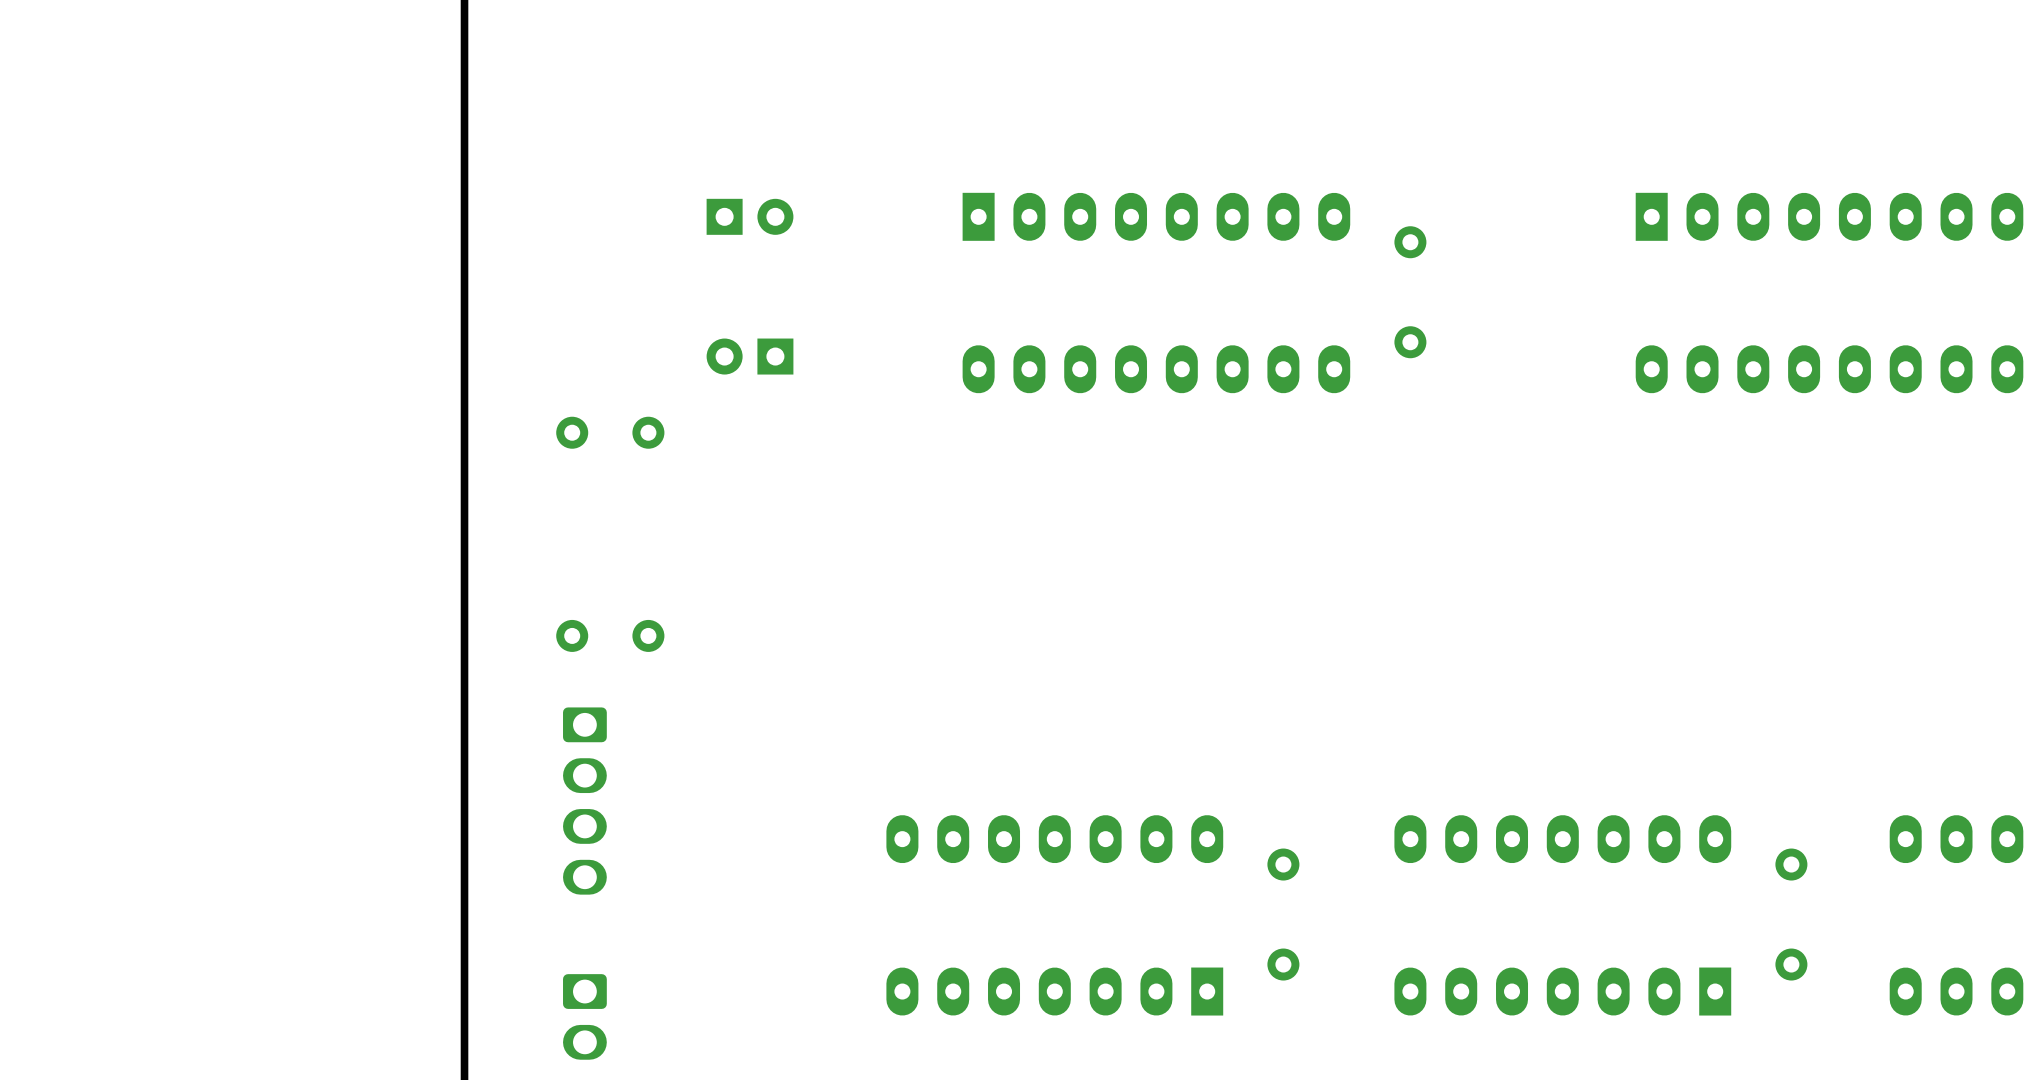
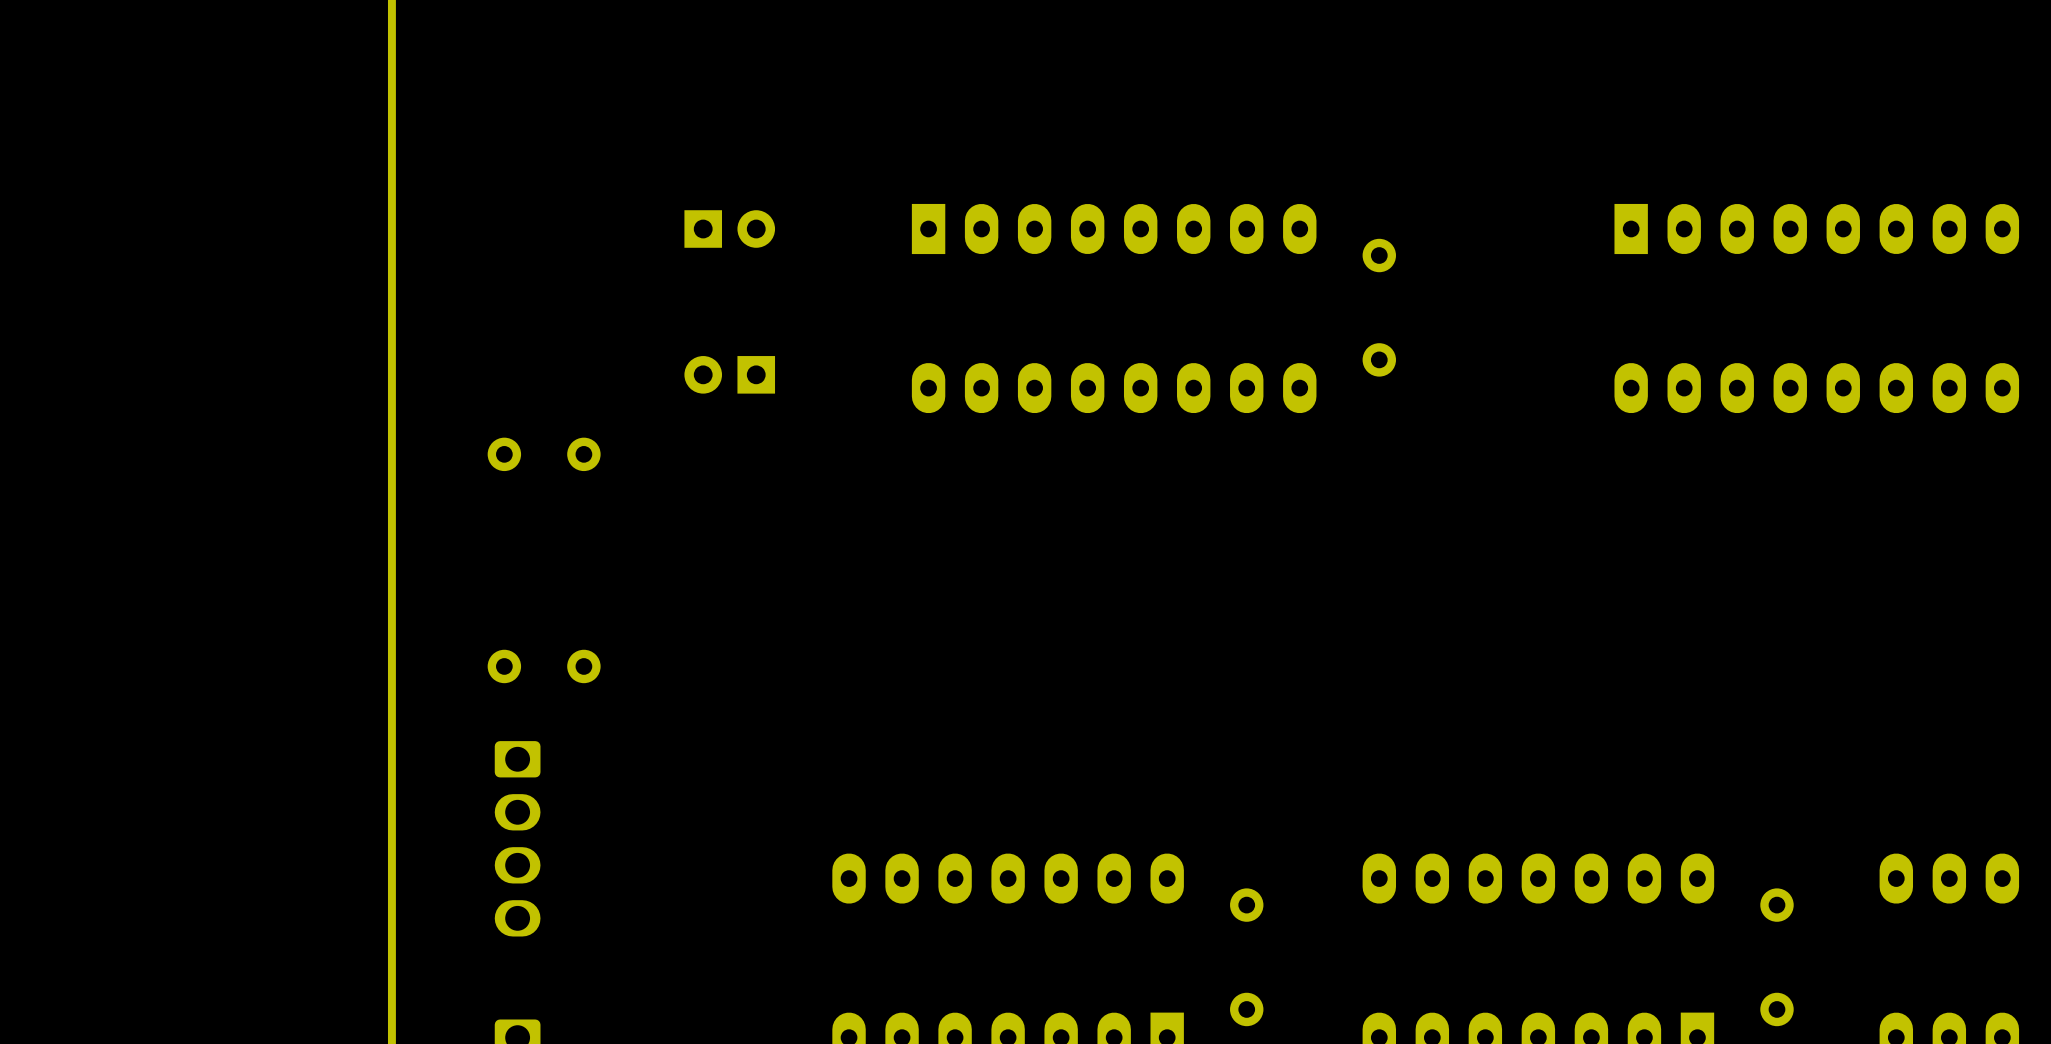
part position: (750, 216) -> (729, 229)
part position: (750, 356) -> (729, 374)

